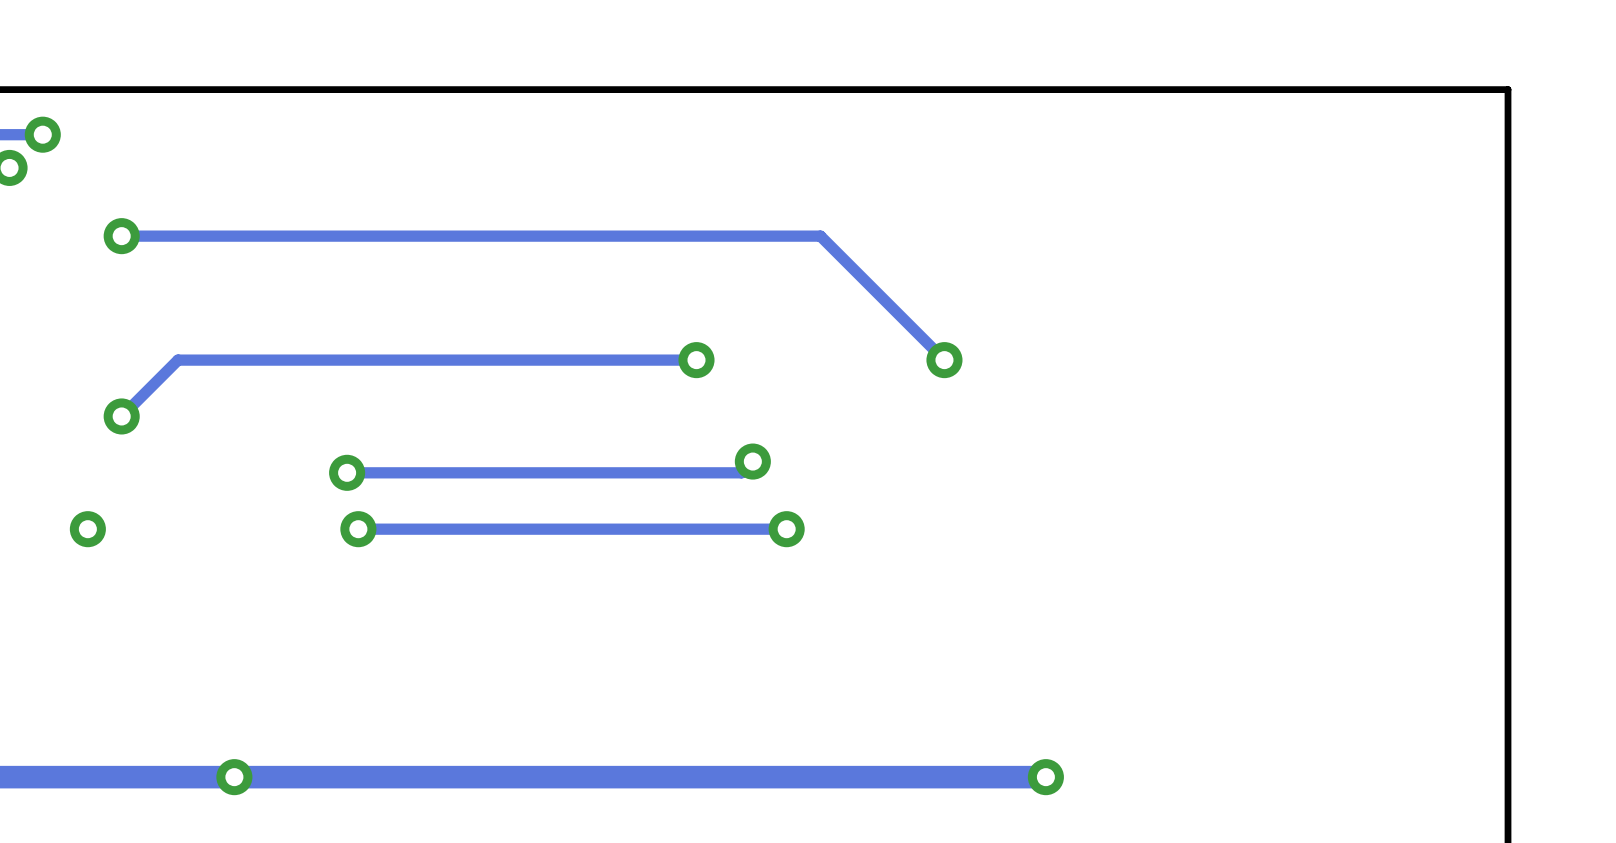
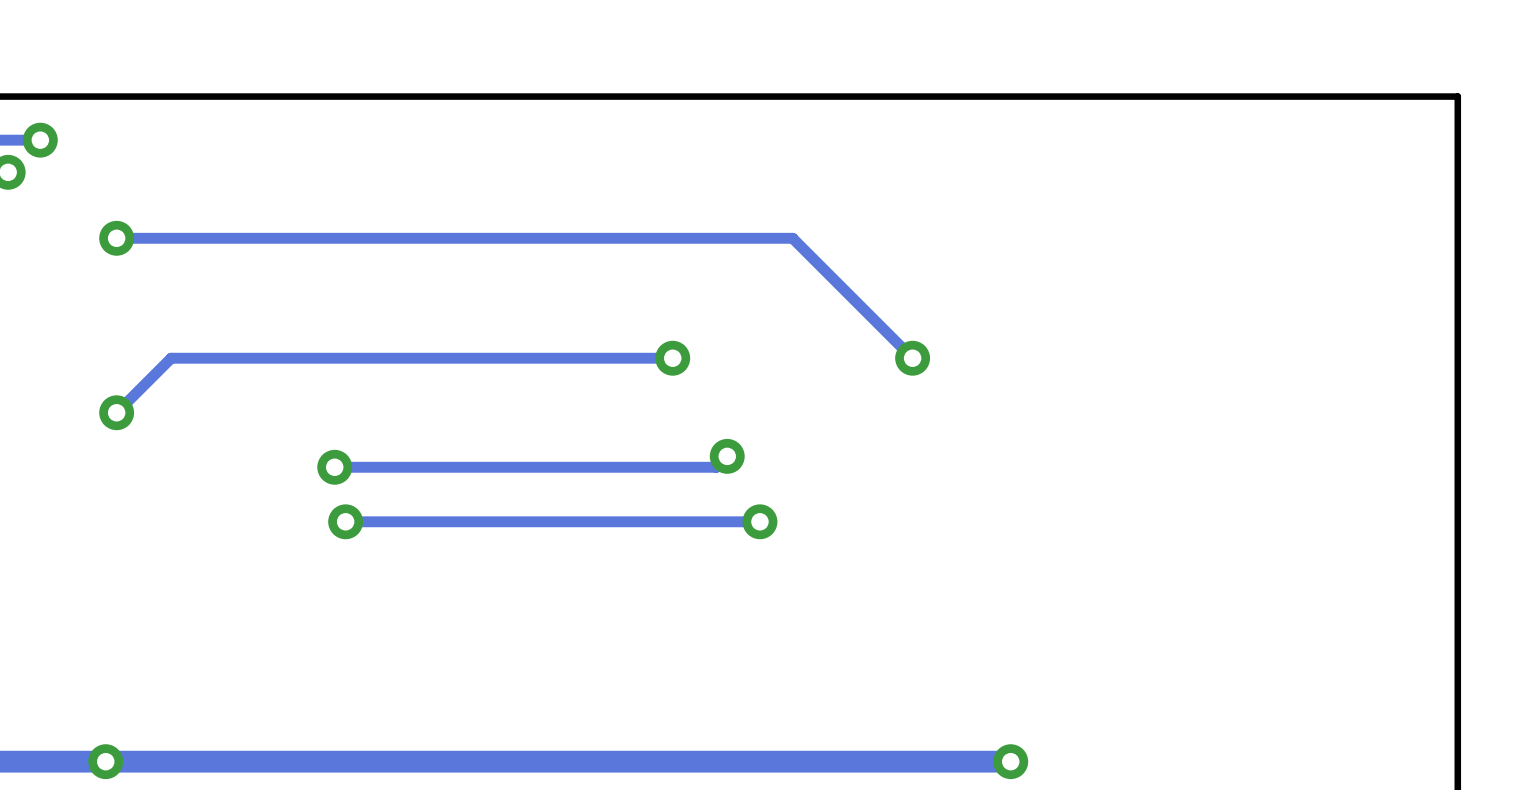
via: (87, 529) -> none
via position: (234, 777) -> (105, 761)

